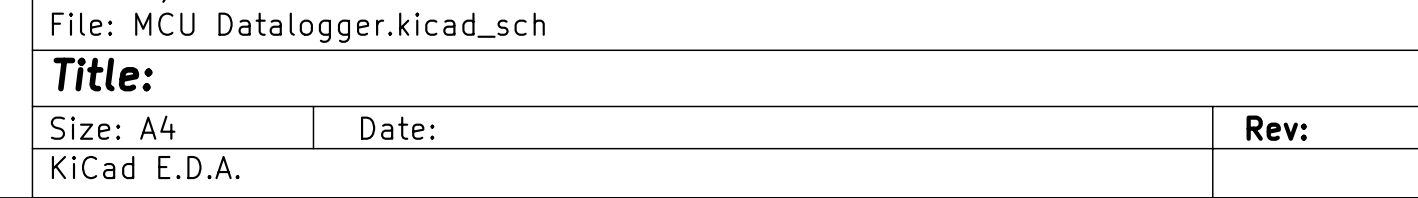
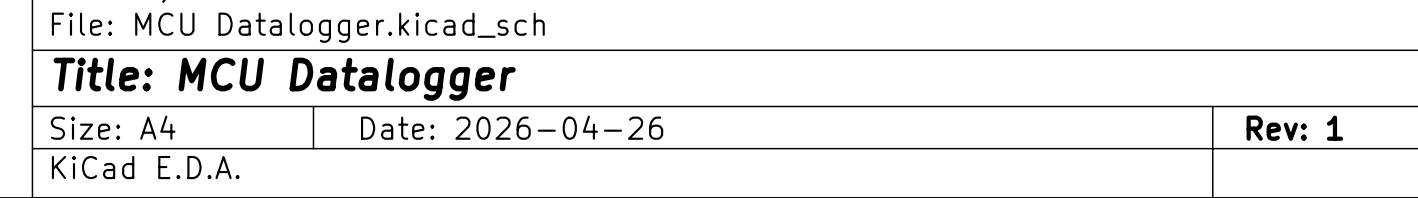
title block: Title: (103, 74) -> Title: MCU Datalogger (284, 79)
title block: Date: (397, 128) -> Date: 2026-04-26 (512, 127)
title block: Rev: (1276, 128) -> Rev: 1 (1294, 128)

